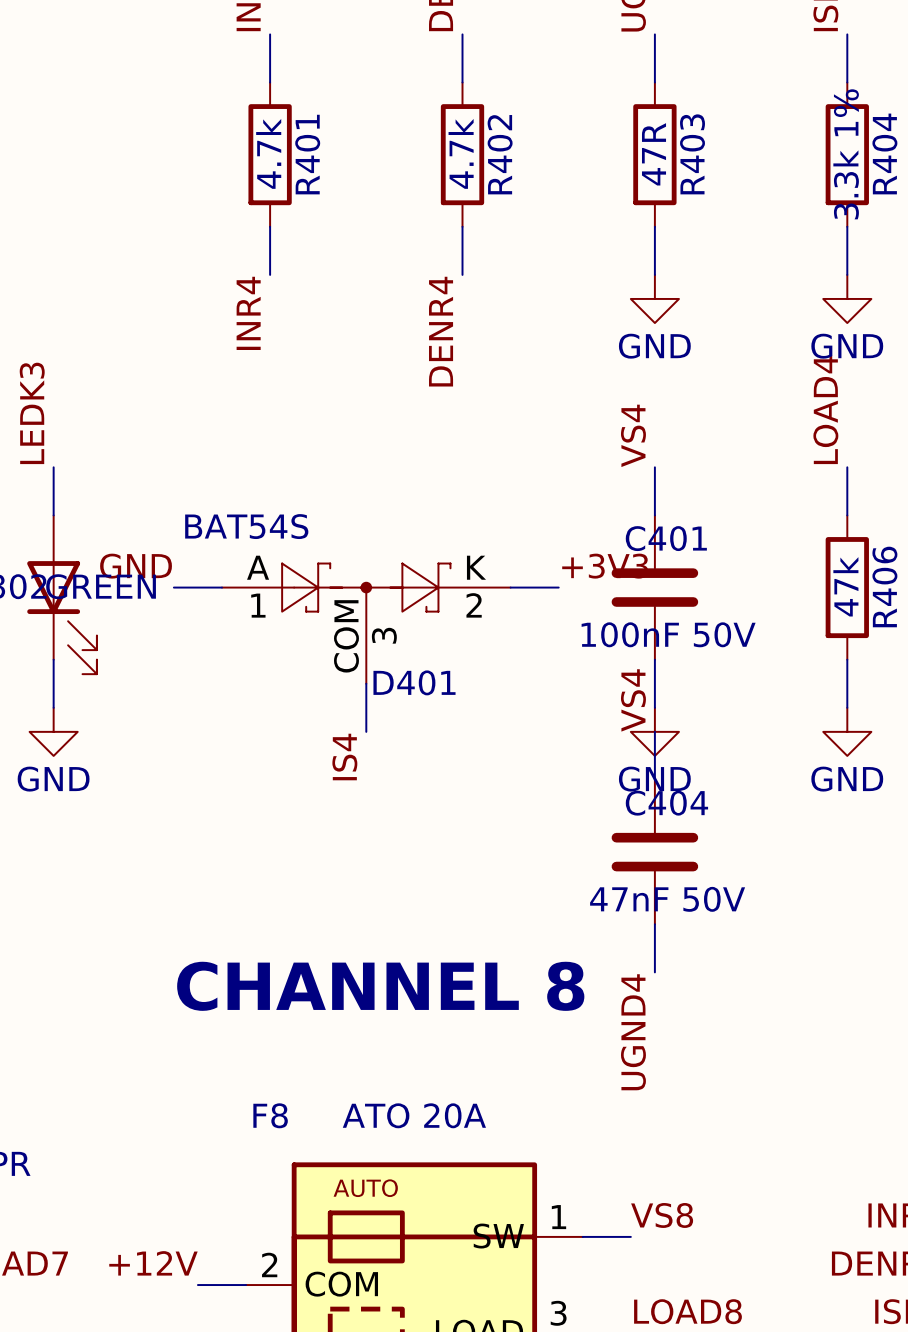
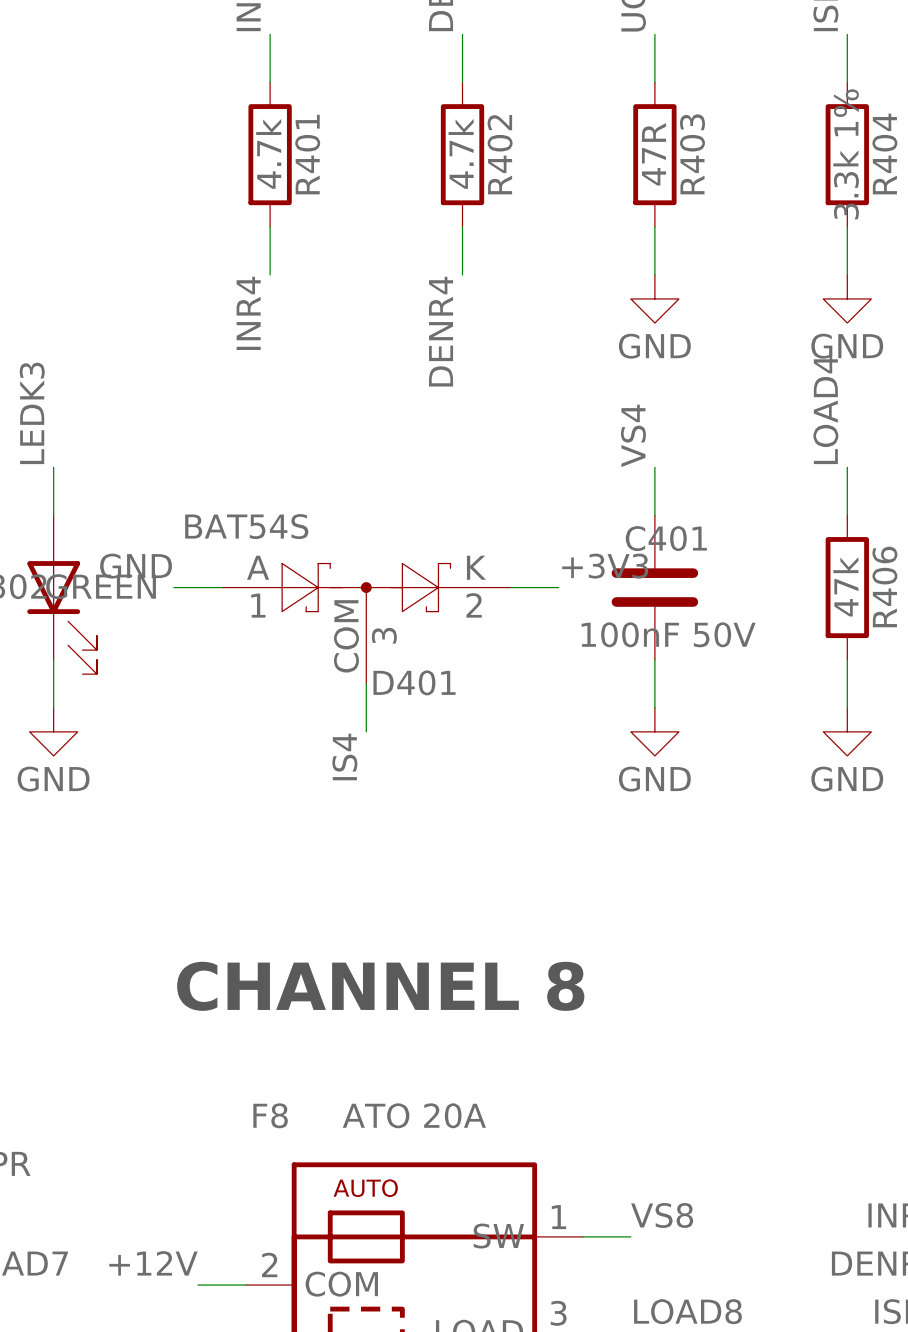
label: VS4 (633, 700) -> none
wire: (654, 731) (654, 779) -> none
C404: 47nF 50V (654, 852) -> none
wire: (654, 924) (654, 972) -> none
label: UGND4 (633, 1032) -> none

